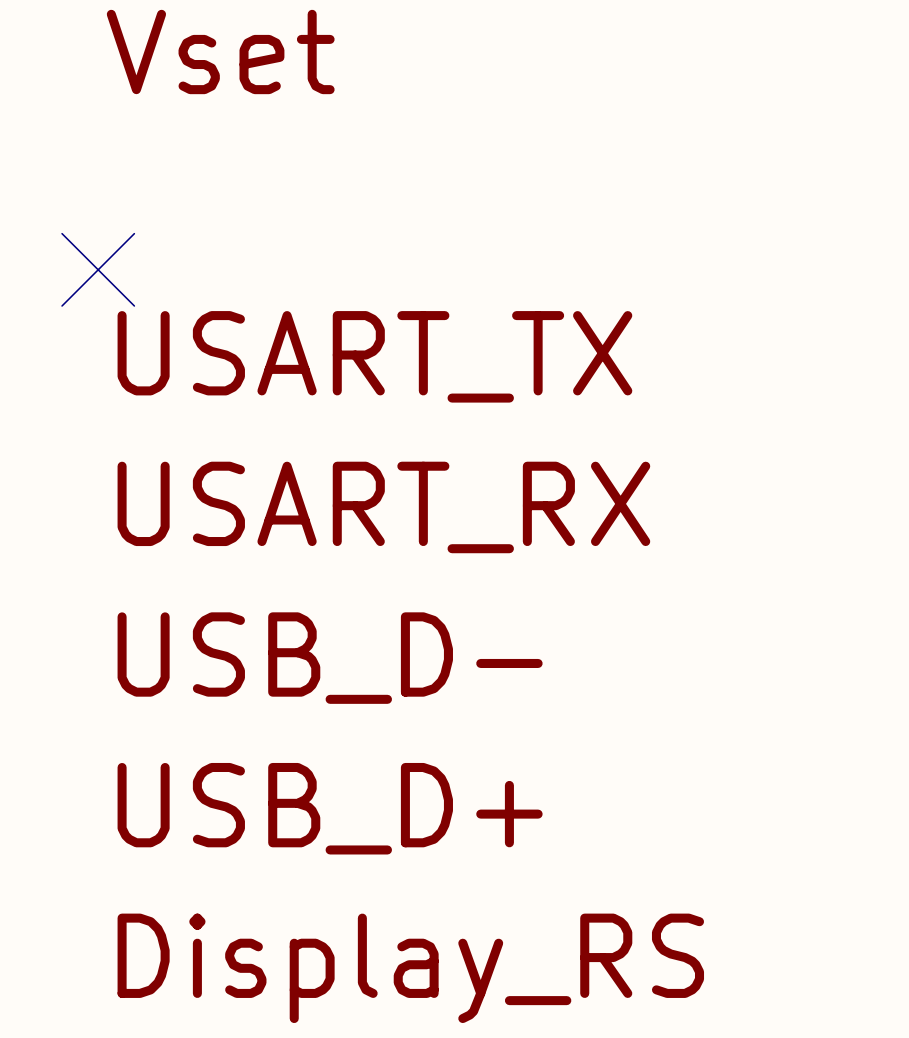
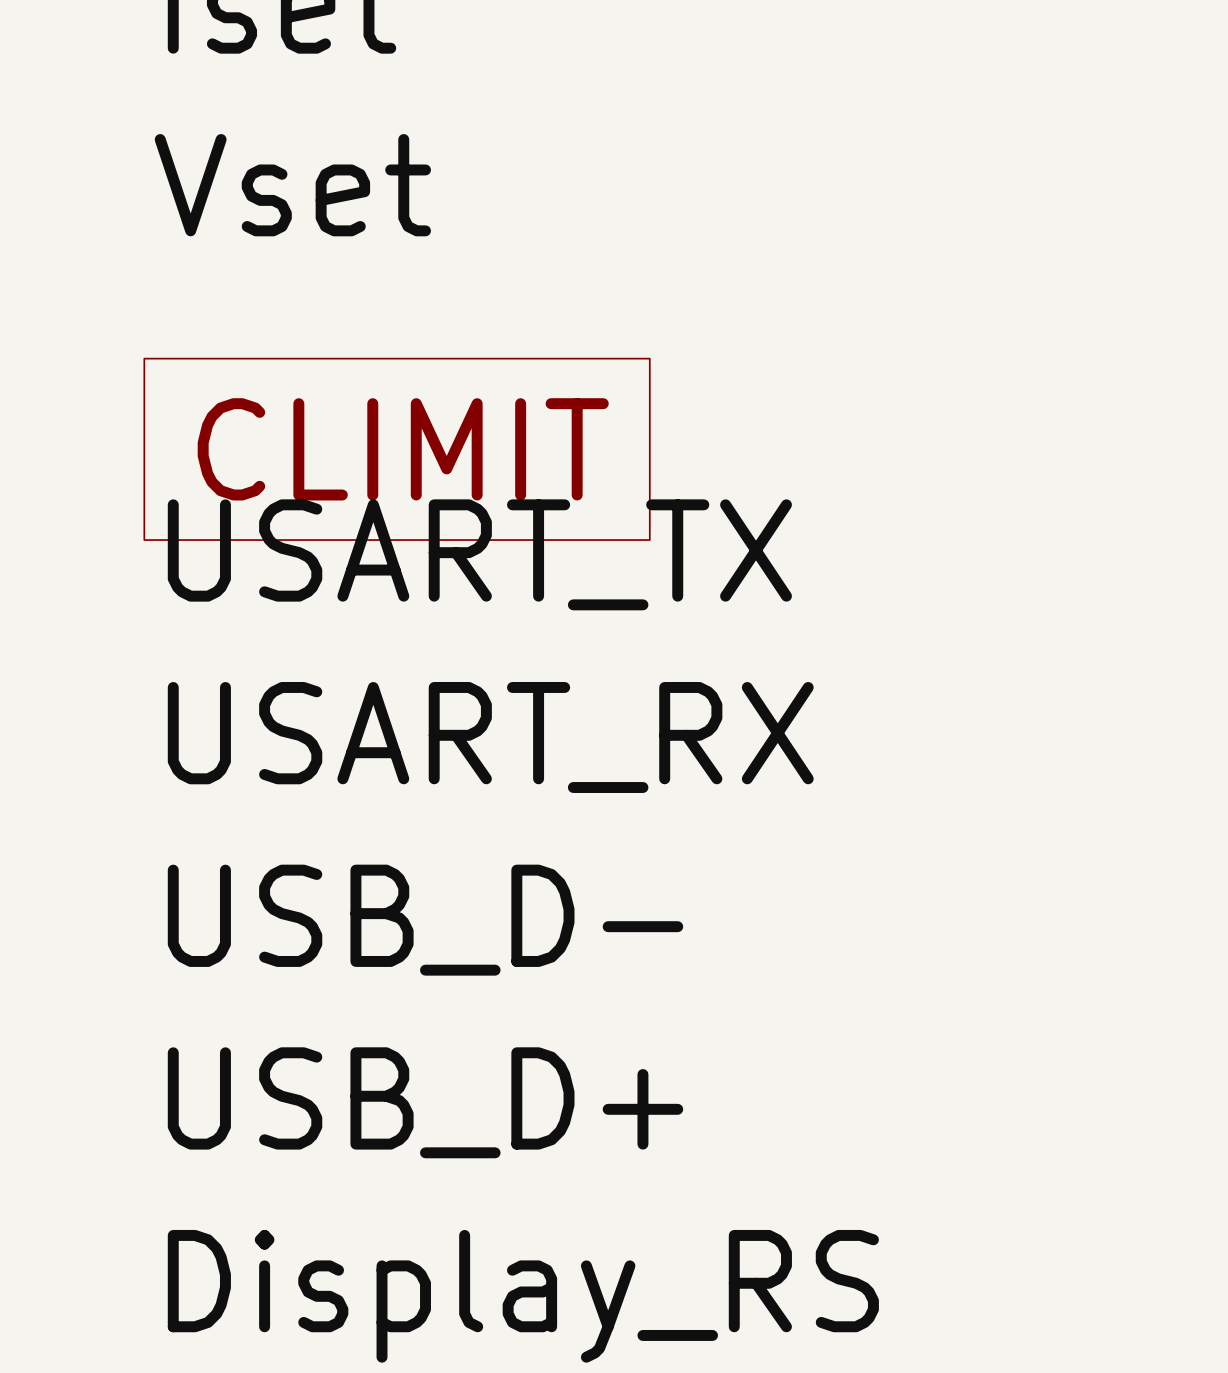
no-connect mark: (98, 269) -> none
global label: none -> CLIMIT (403, 449)

